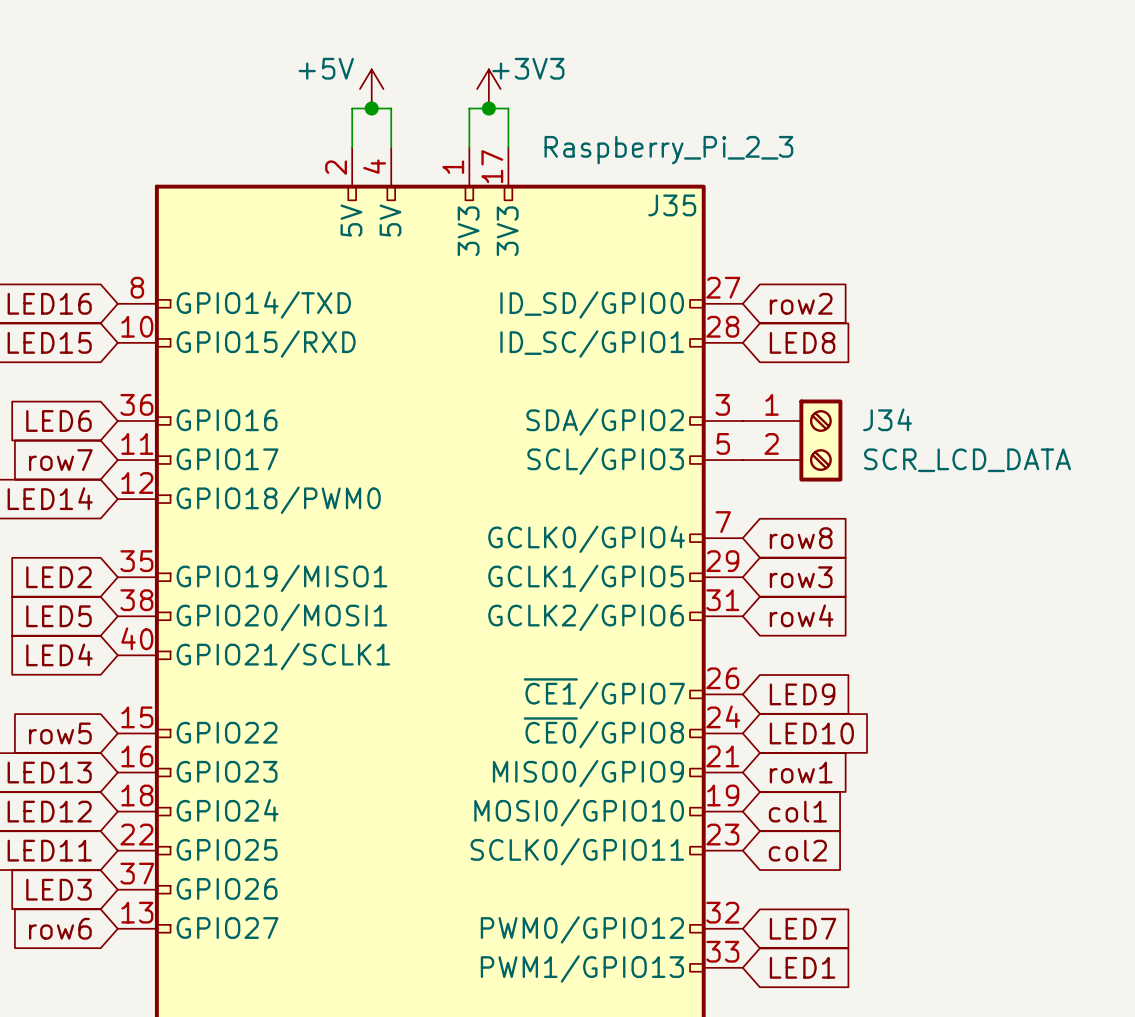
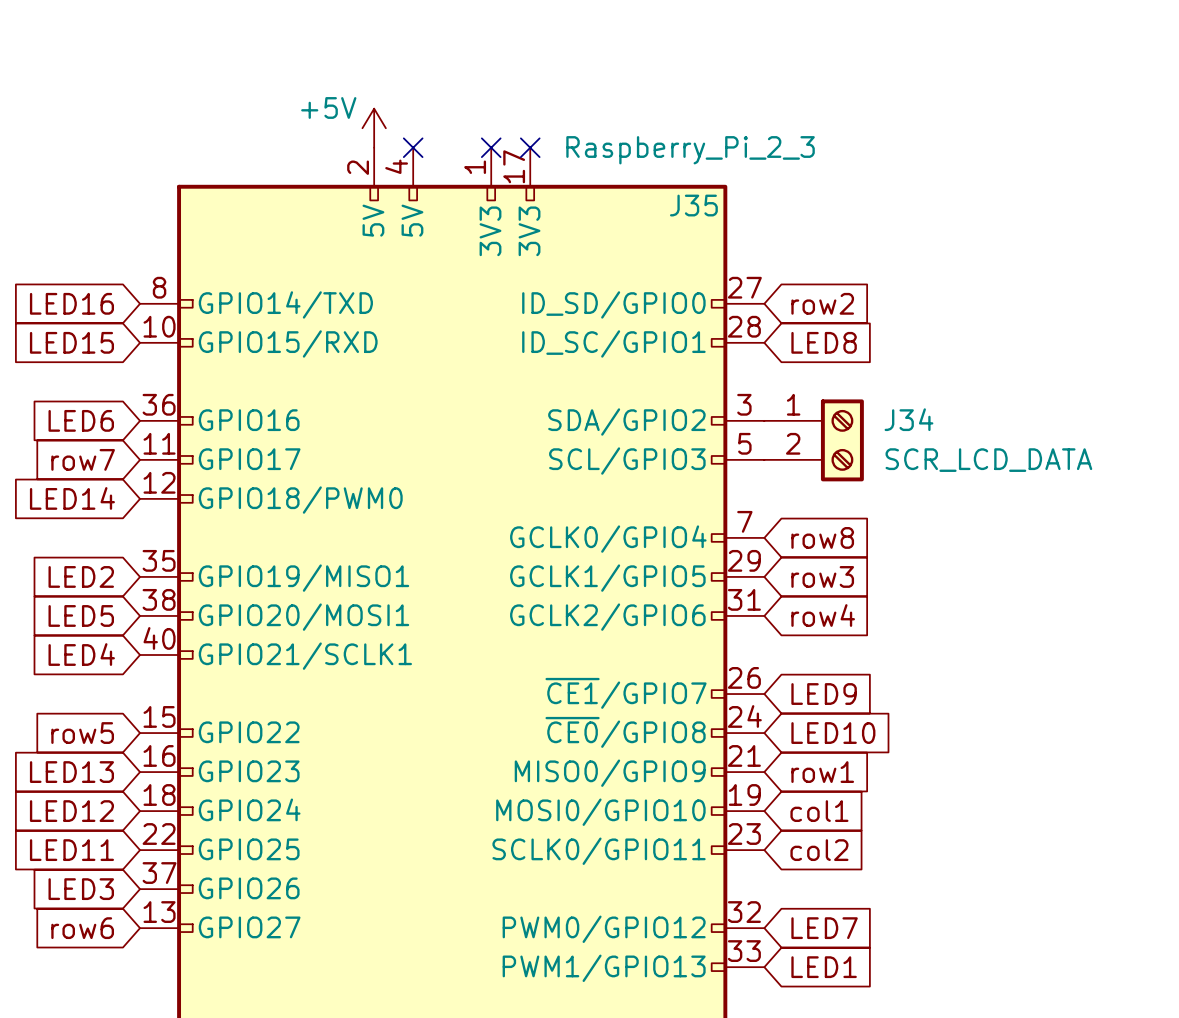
power symbol position: +5V (371, 88) -> +5V (374, 128)
power symbol: +3V3 (488, 88) -> none
junction: (371, 108) -> none
junction: (488, 108) -> none
wire: (352, 147) (352, 108) (391, 108) (391, 147) -> none
no-connect mark: none -> (413, 147)
wire: (469, 147) (469, 108) (508, 108) (508, 147) -> none
no-connect mark: none -> (491, 147)
no-connect mark: none -> (530, 147)

